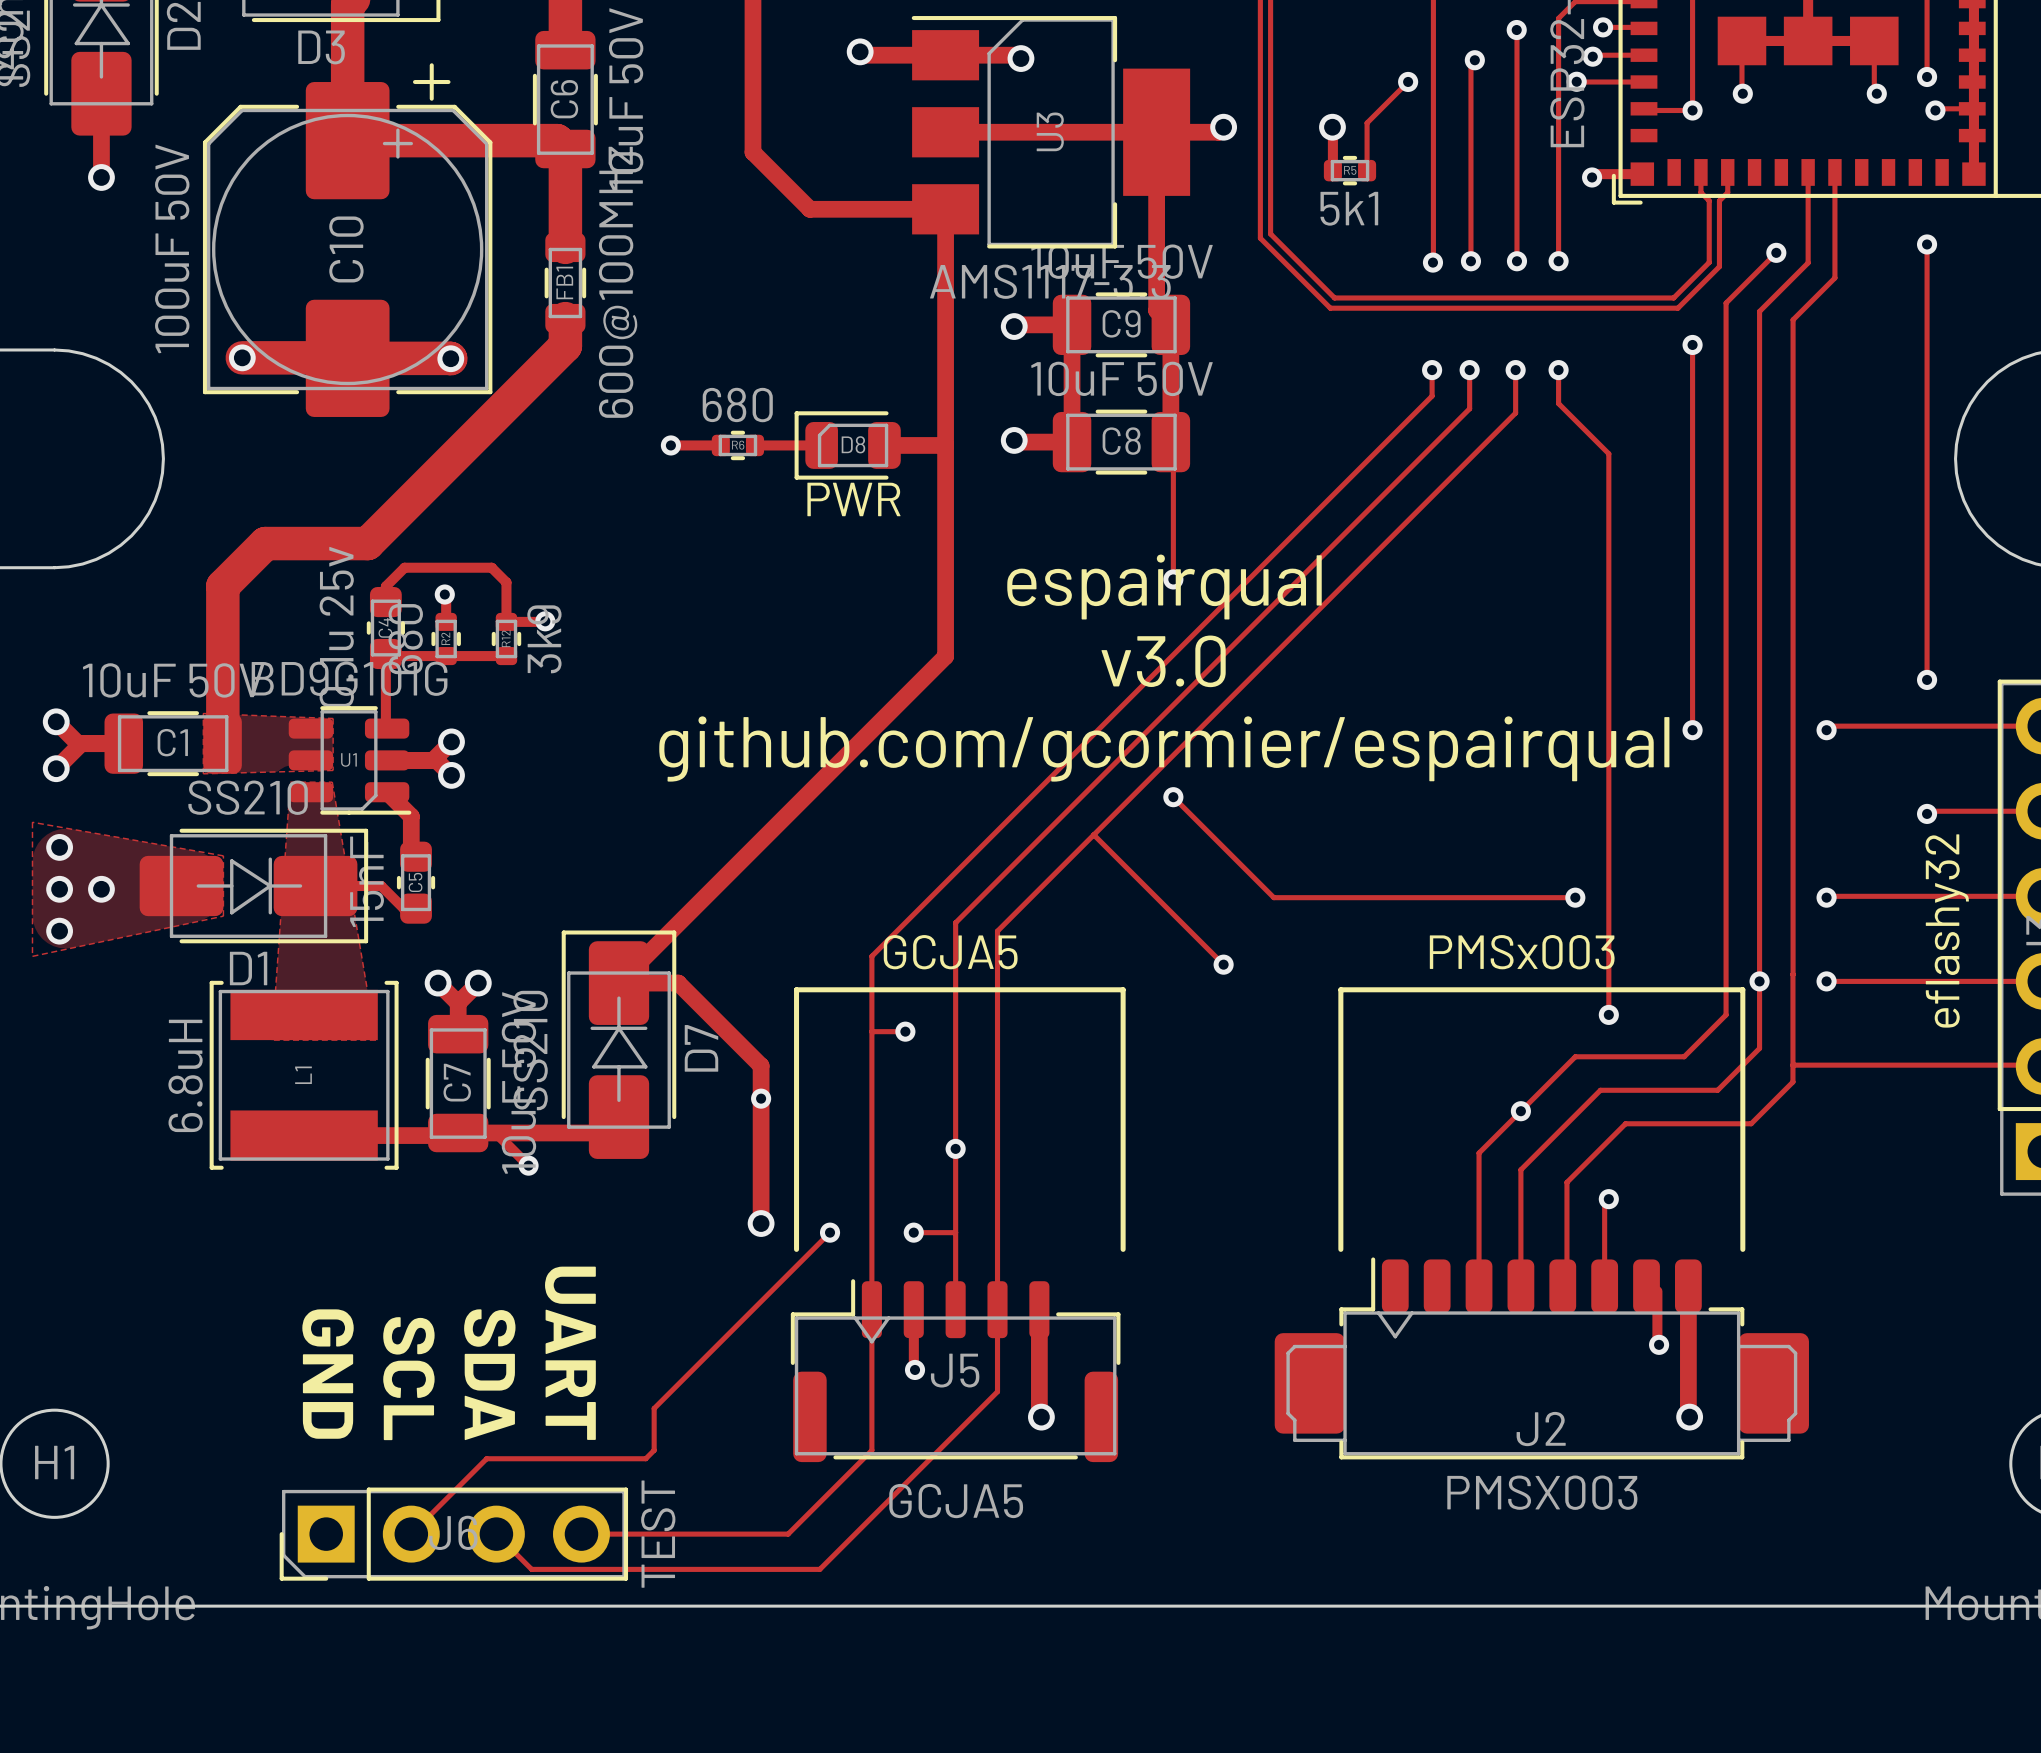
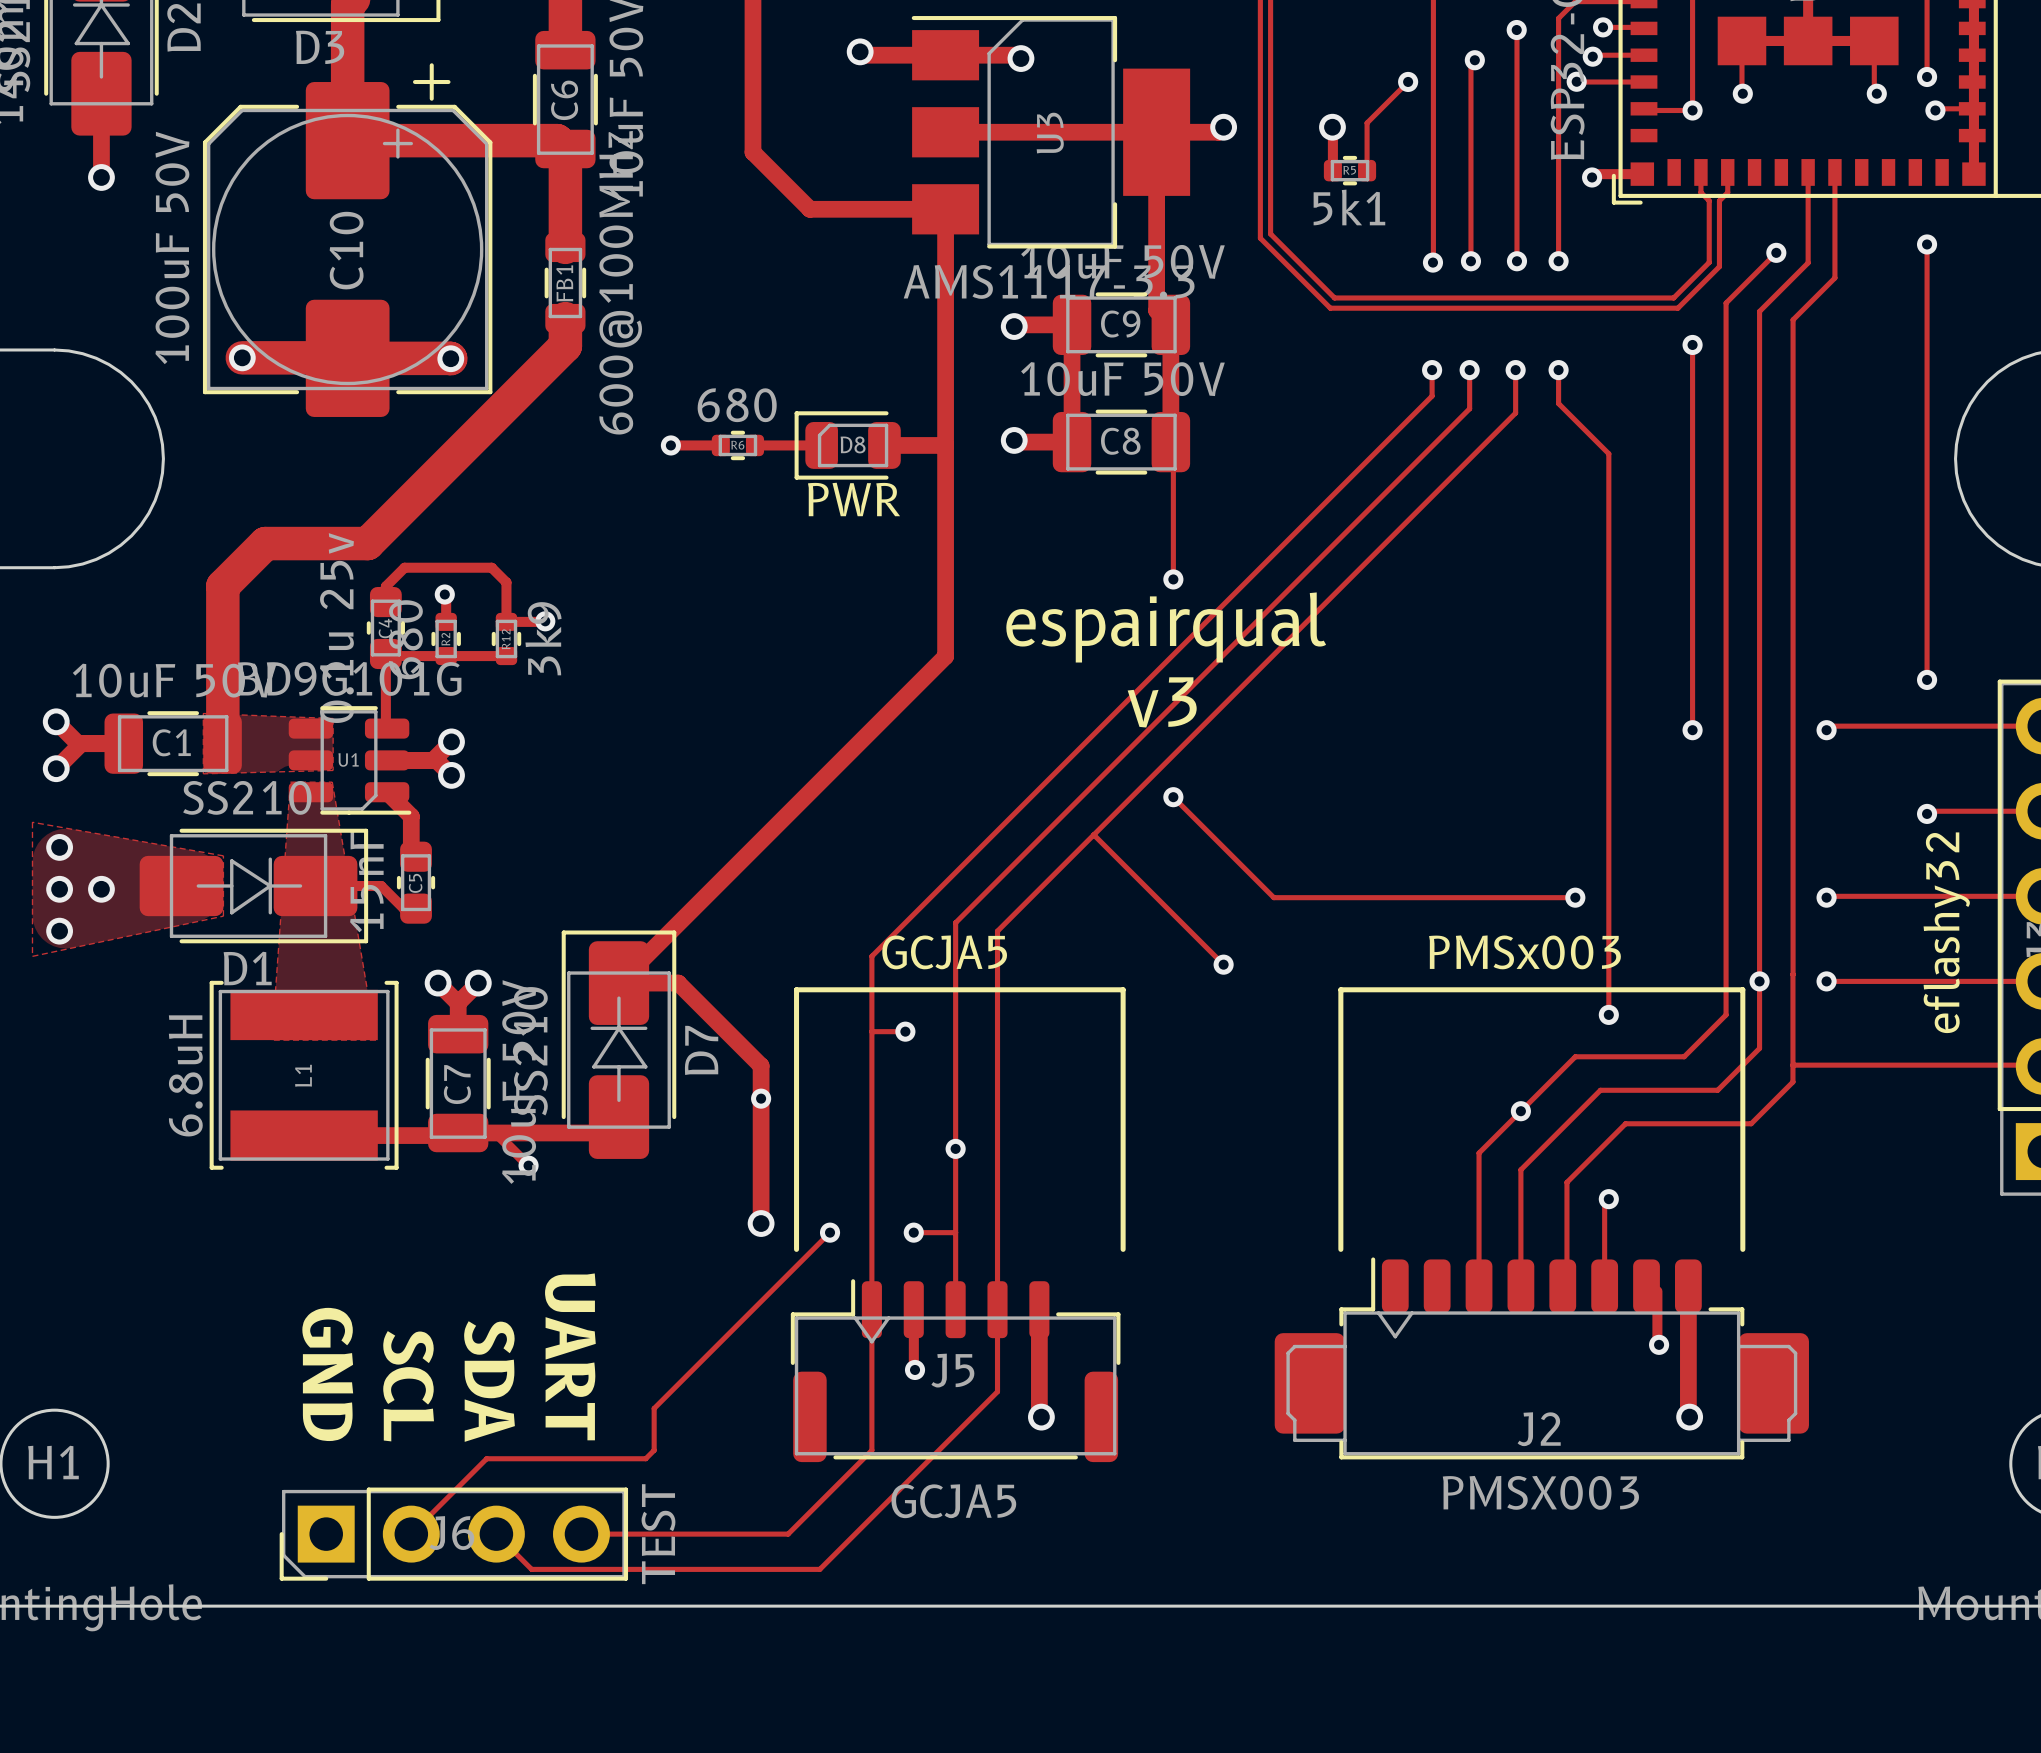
text position: espairqual (1164, 587) -> espairqual (1166, 627)
text: v3.0 (1163, 661) -> v3 (1162, 702)
text: github.com/gcormier/espairqual (1164, 748) -> none

